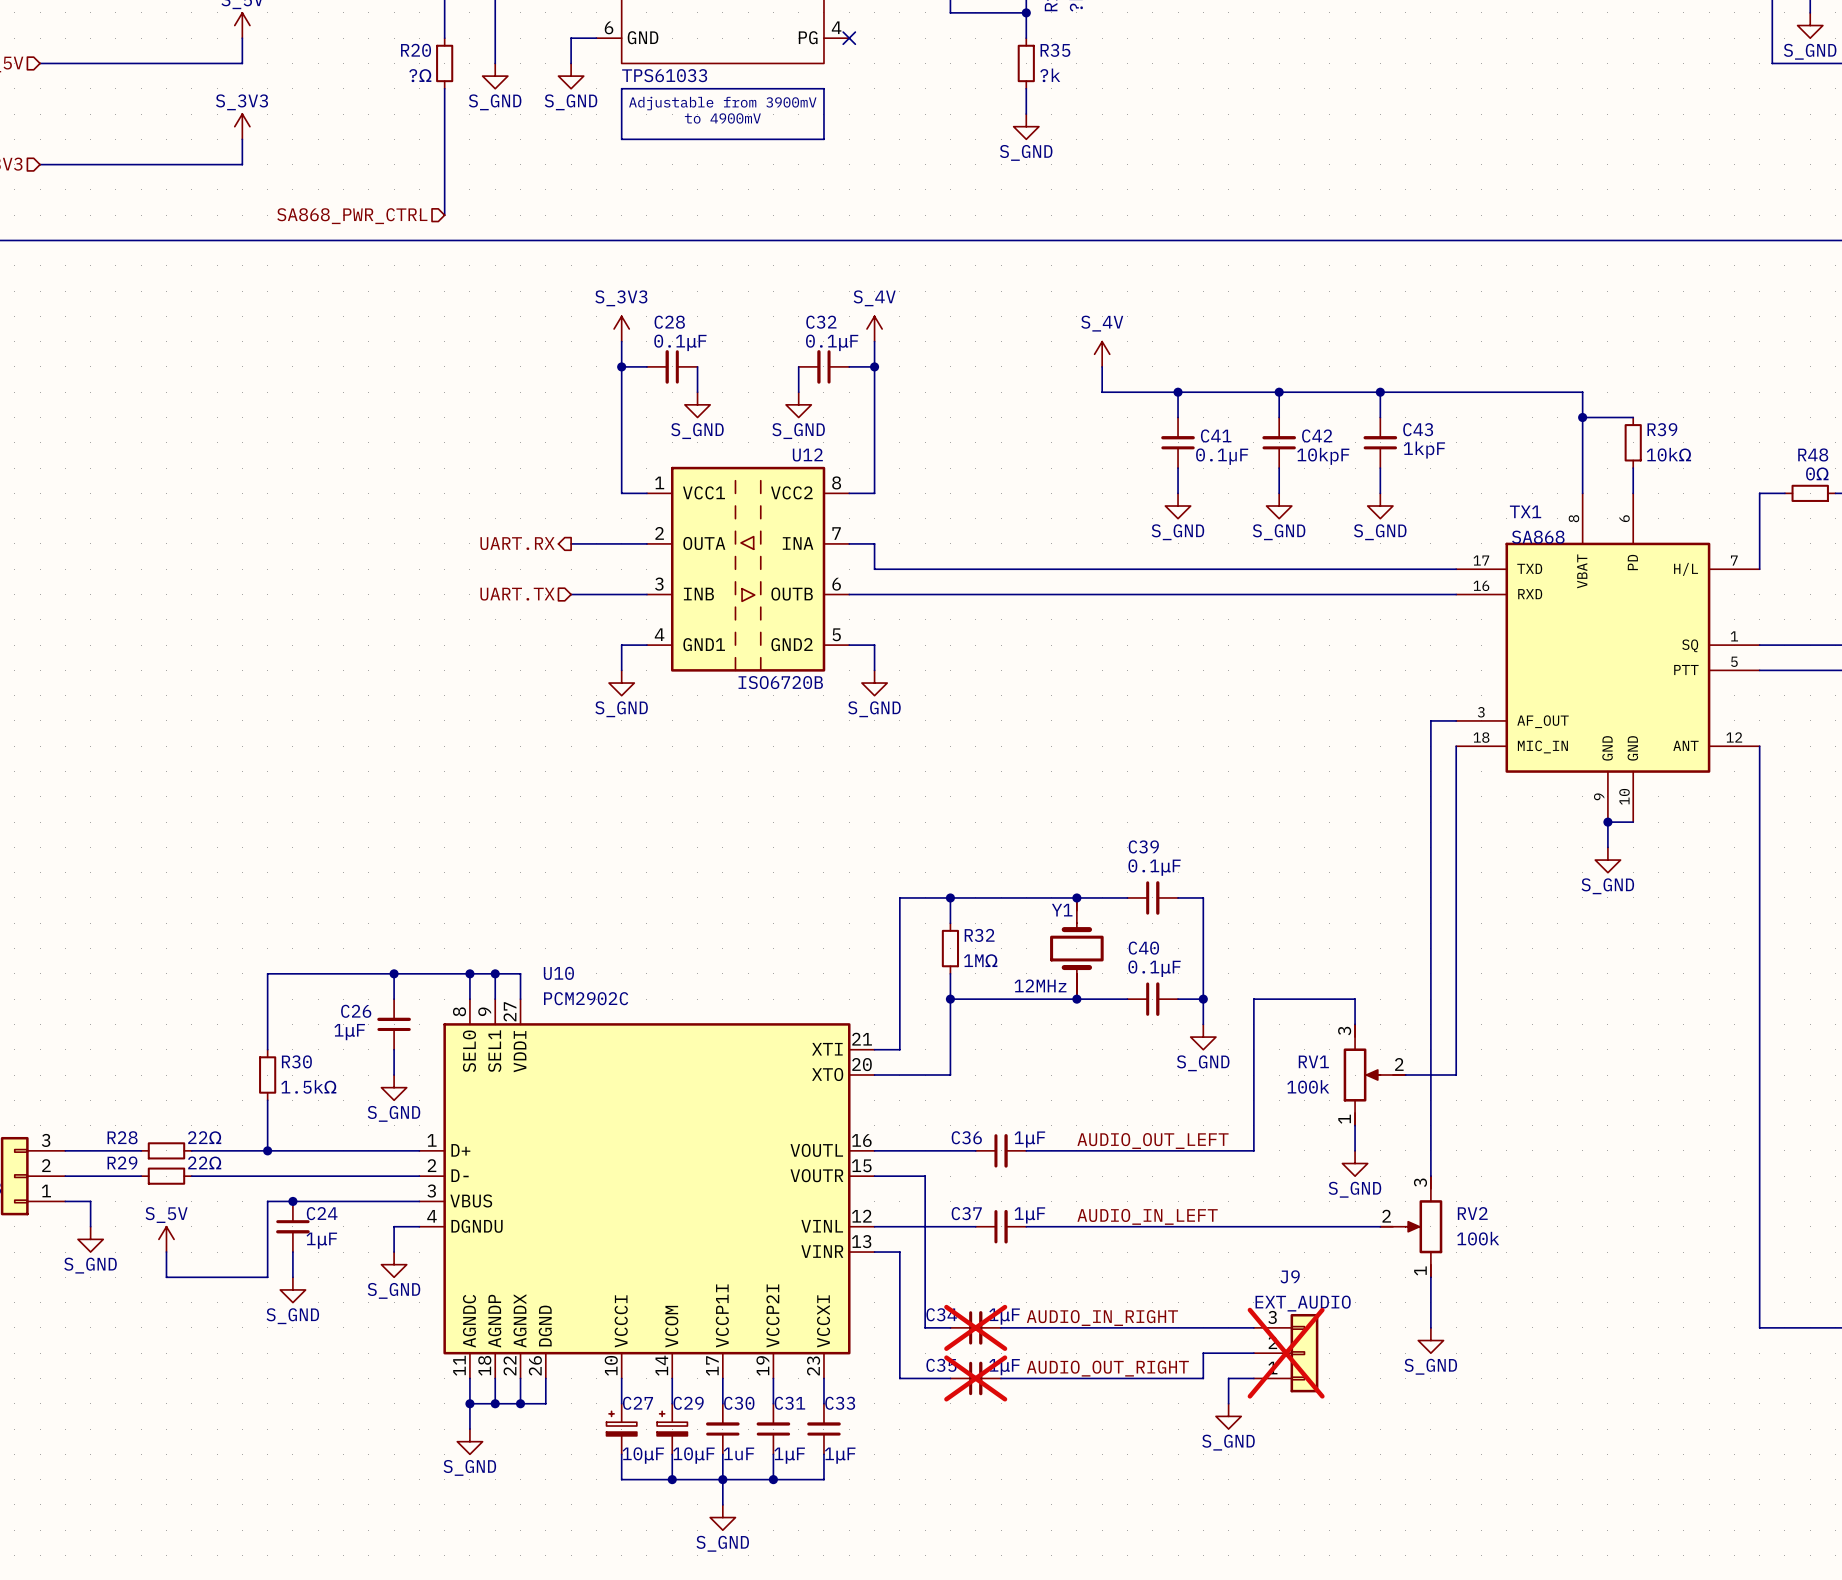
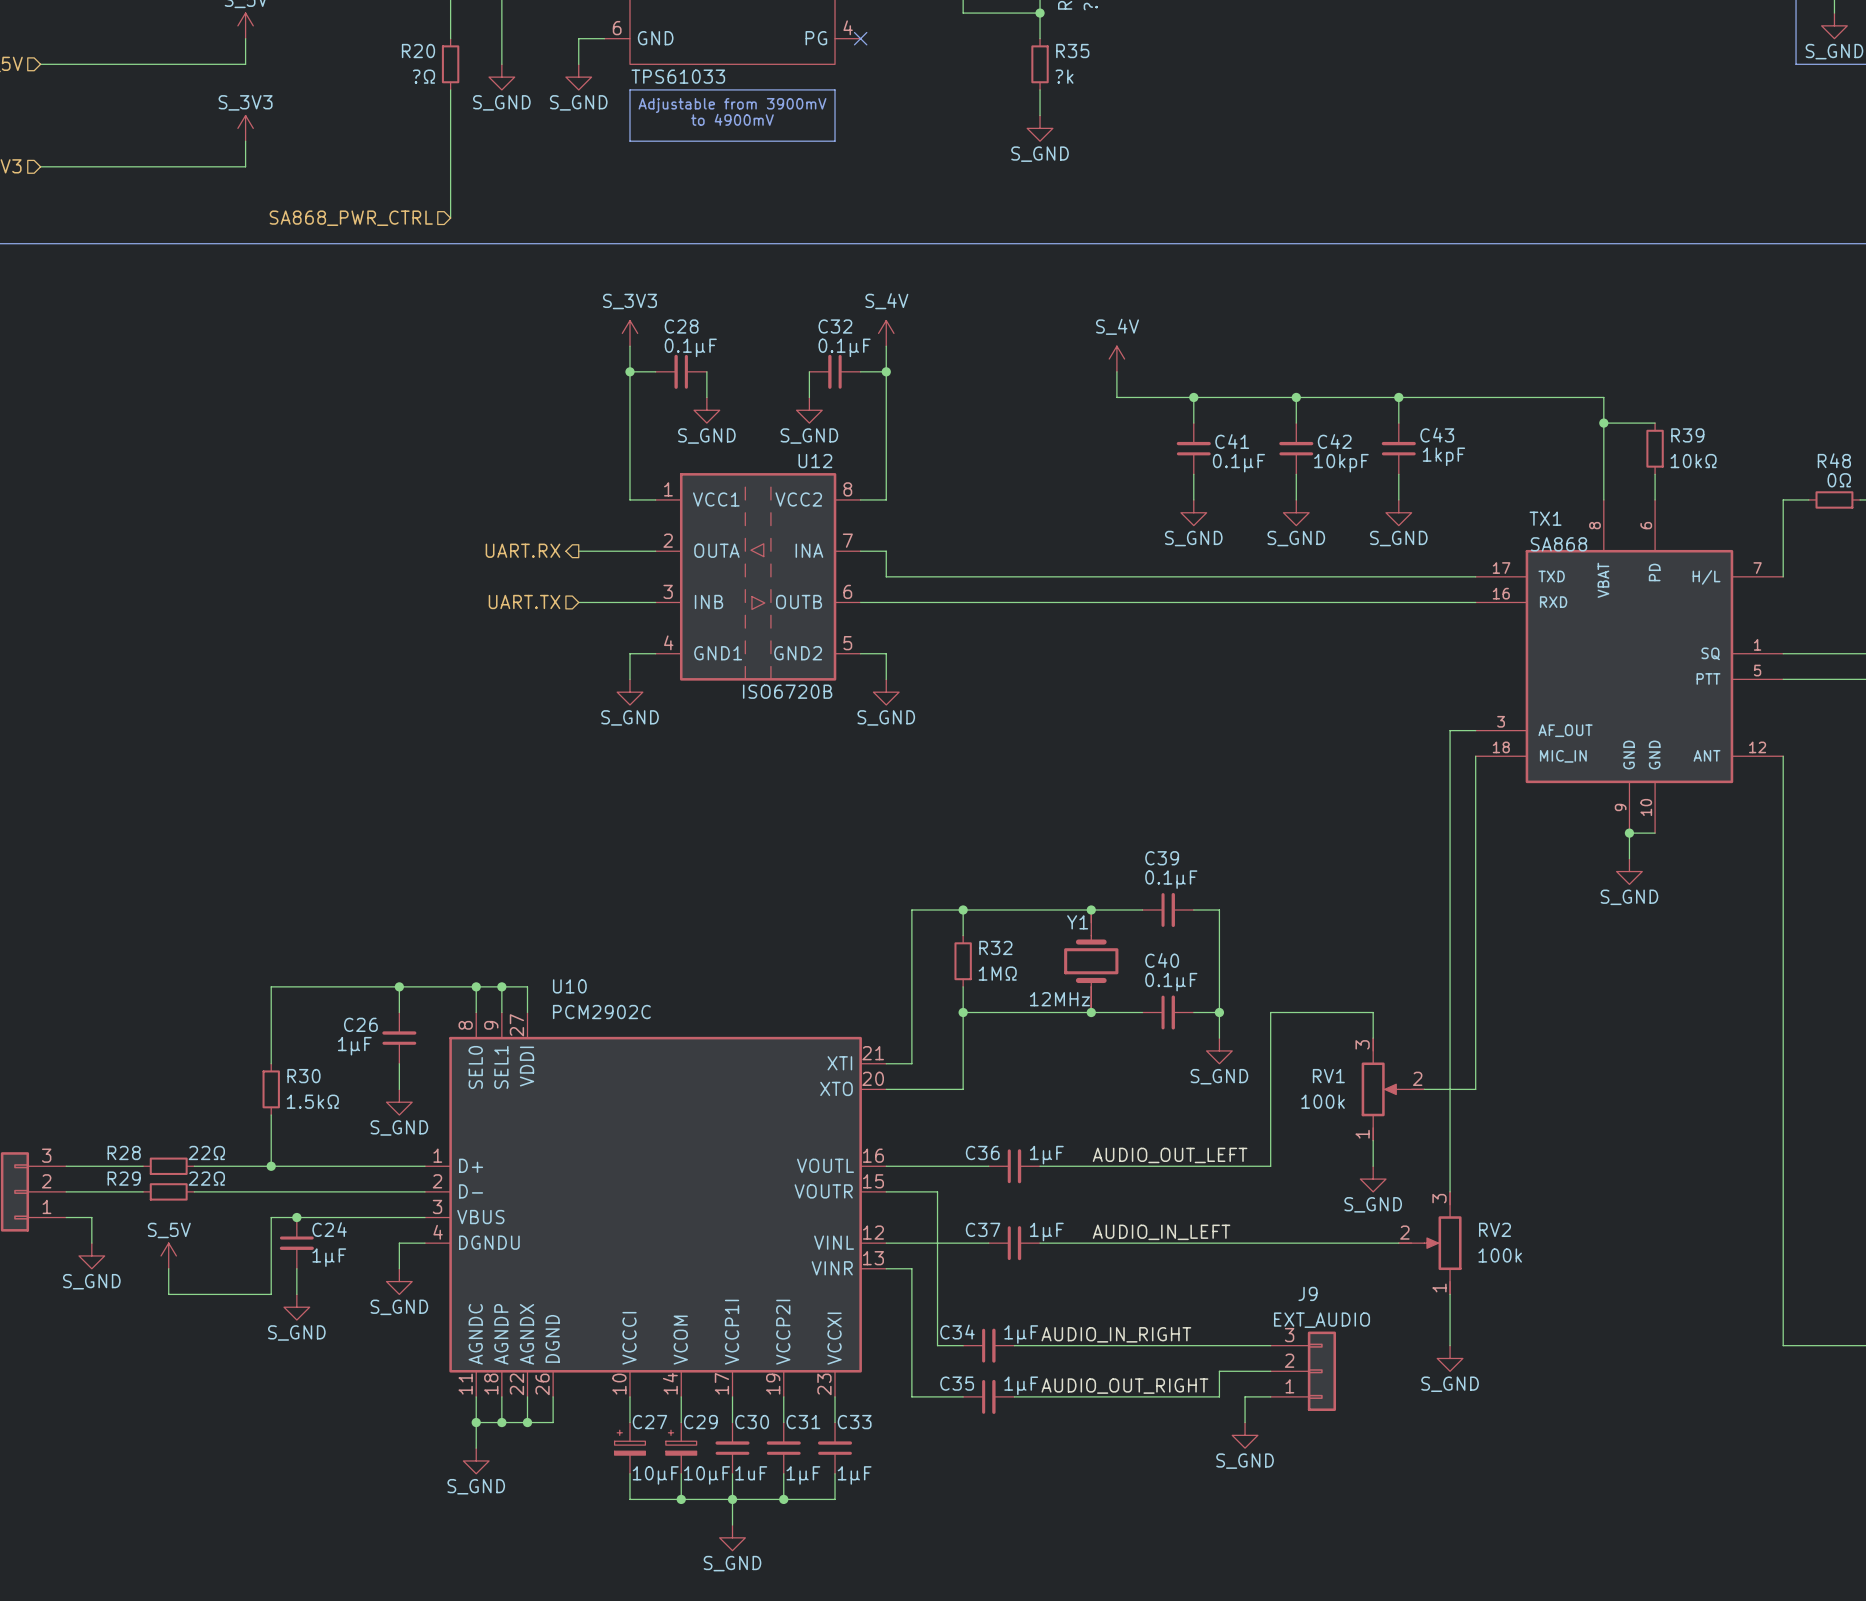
C34 do-not-place cross: (975, 1327) -> none
J9 do-not-place cross: (1286, 1353) -> none
C35 do-not-place cross: (975, 1378) -> none

